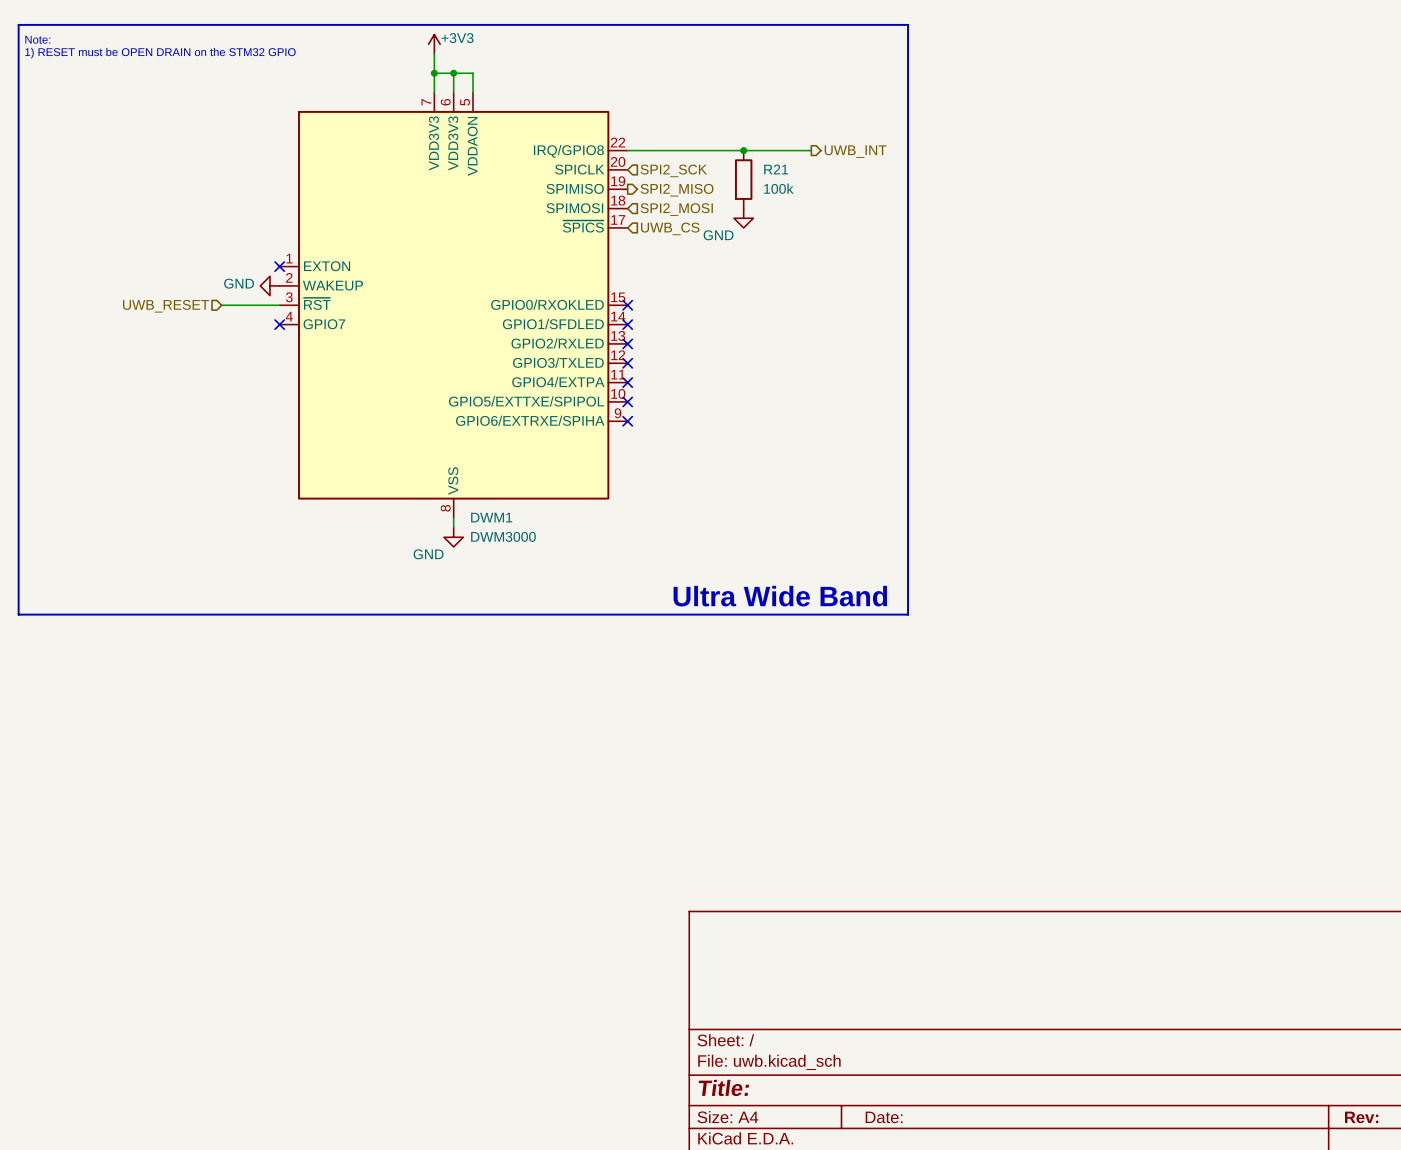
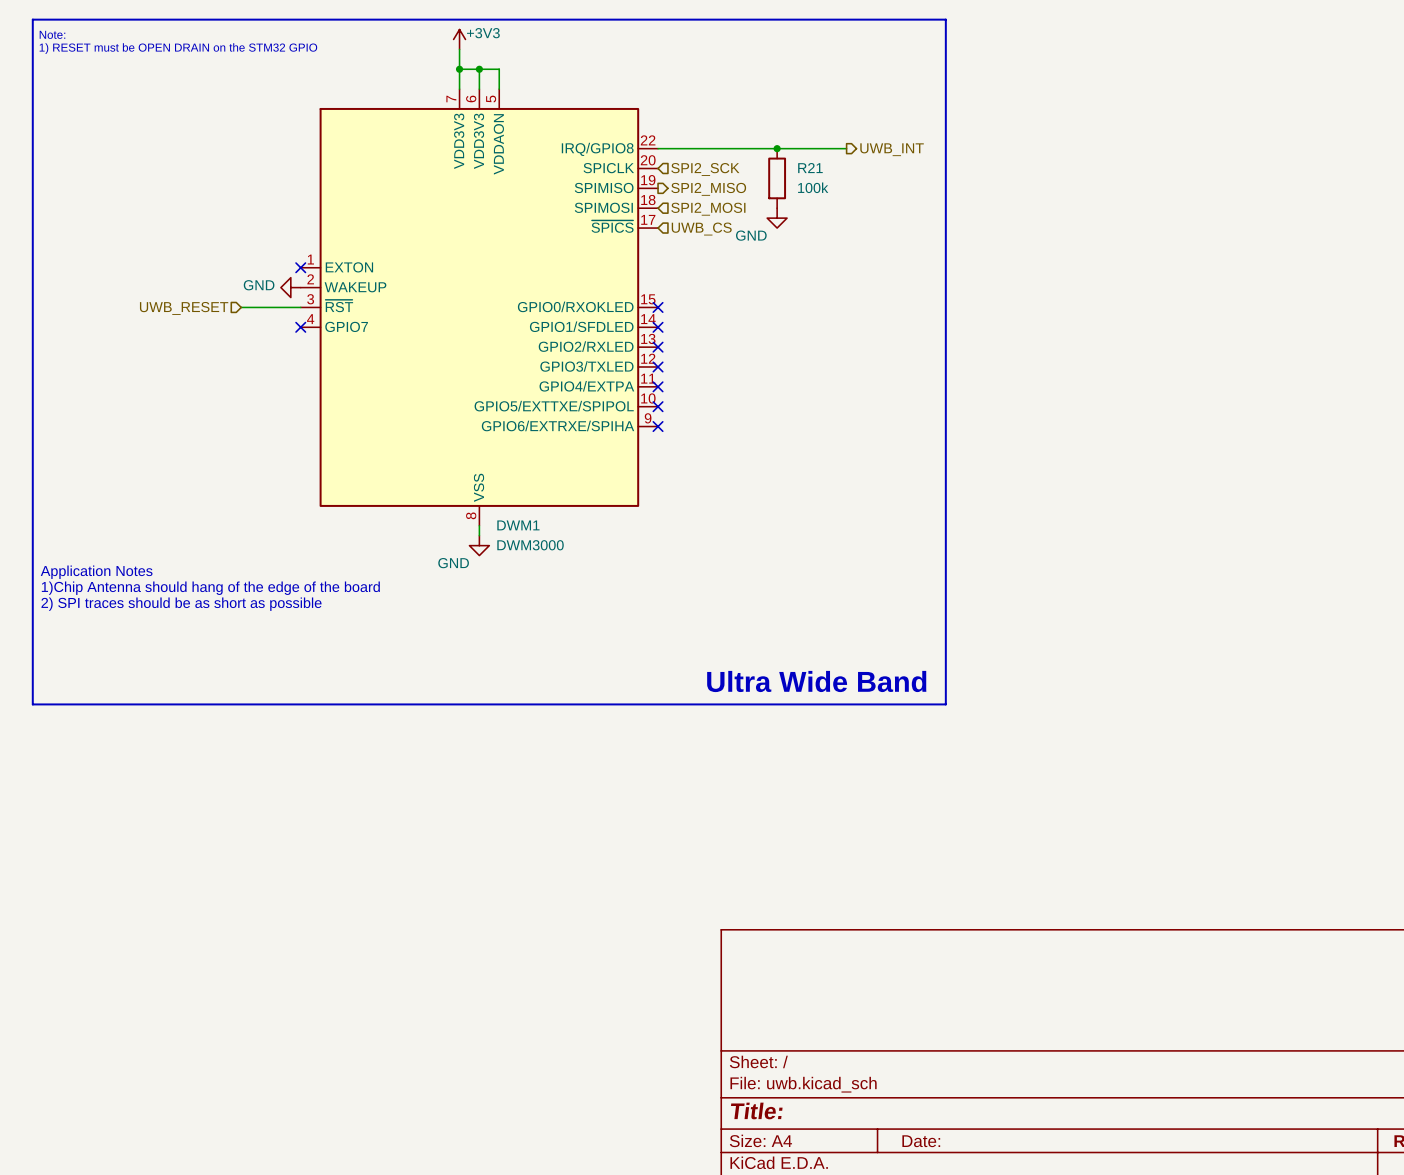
text: none -> Application Notes (96, 572)
text: none -> 1)Chip Antenna should hang of the edge of the board (210, 588)
text: none -> 2) SPI traces should be as short as possible (181, 604)
text position: Ultra Wide Band (780, 596) -> Ultra Wide Band (816, 681)
line: (18, 614) (908, 614) -> (32, 625) (32, 704) (945, 704) (945, 625)

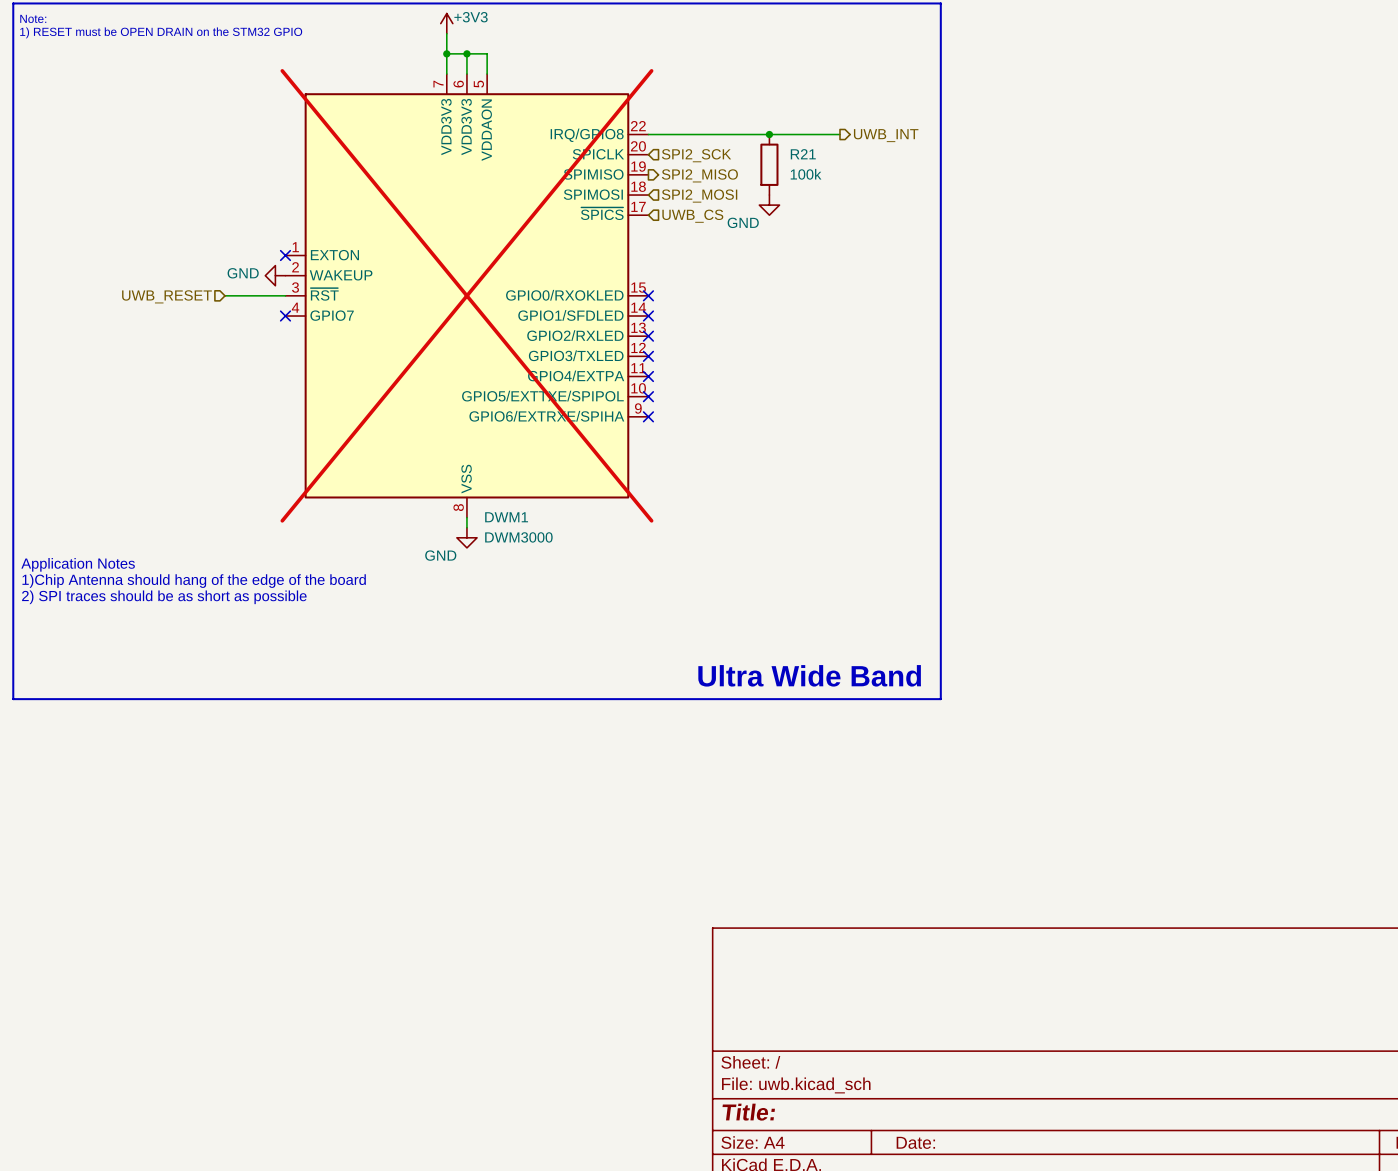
DWM1 do-not-place cross: none -> (466, 295)

